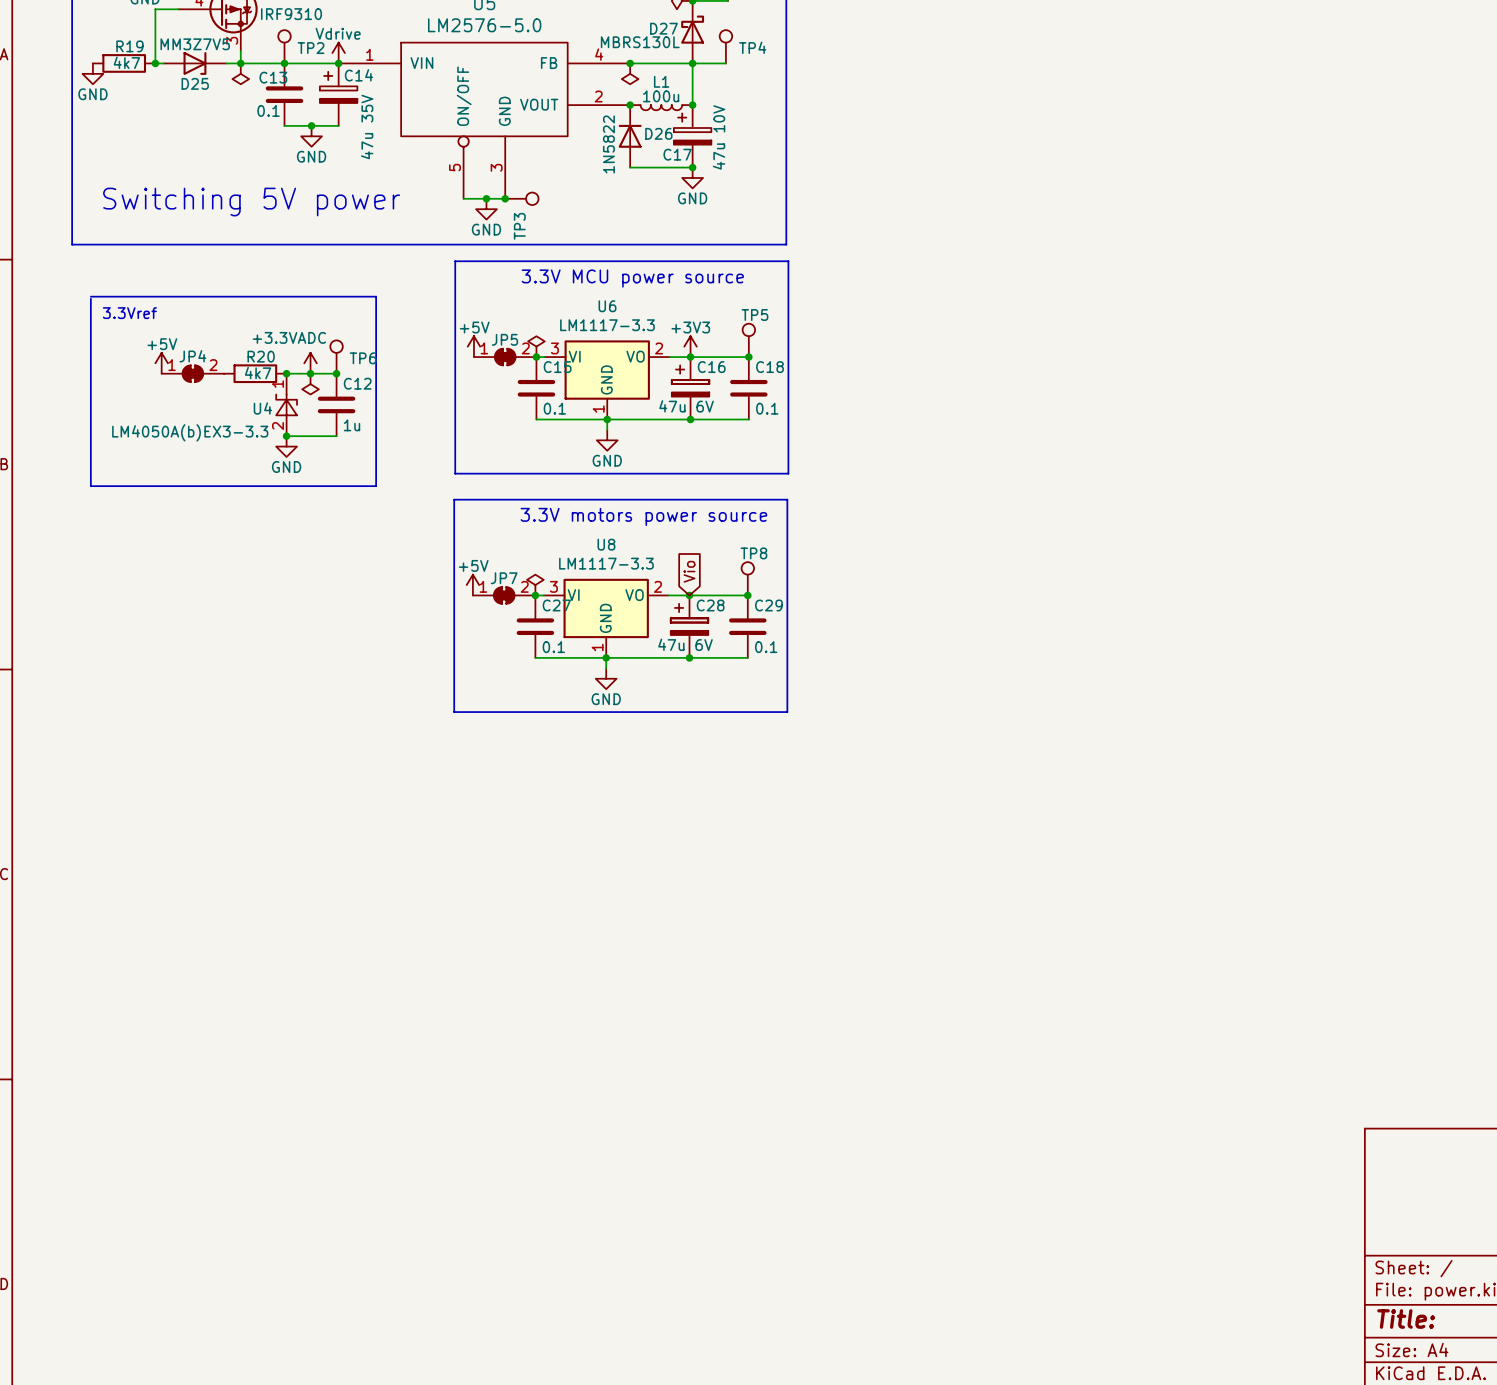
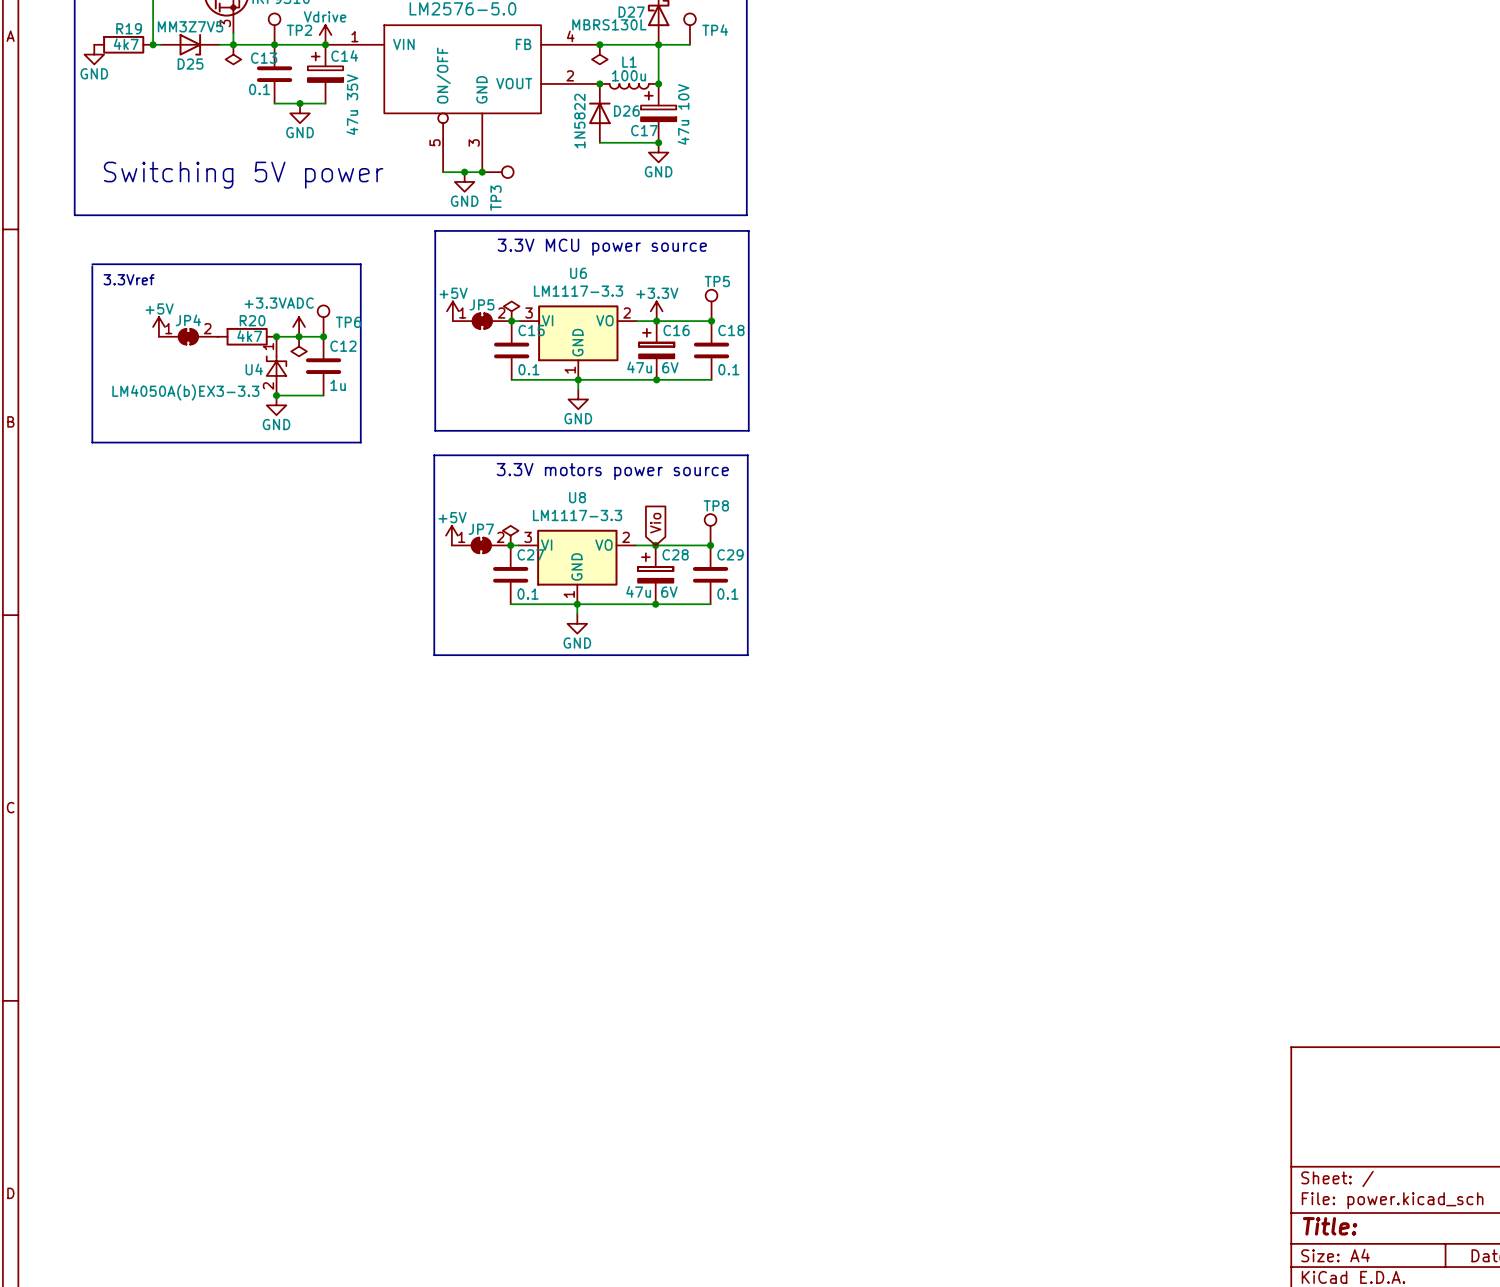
power symbol: +3V3 (690, 346) -> +3.3V (656, 311)

